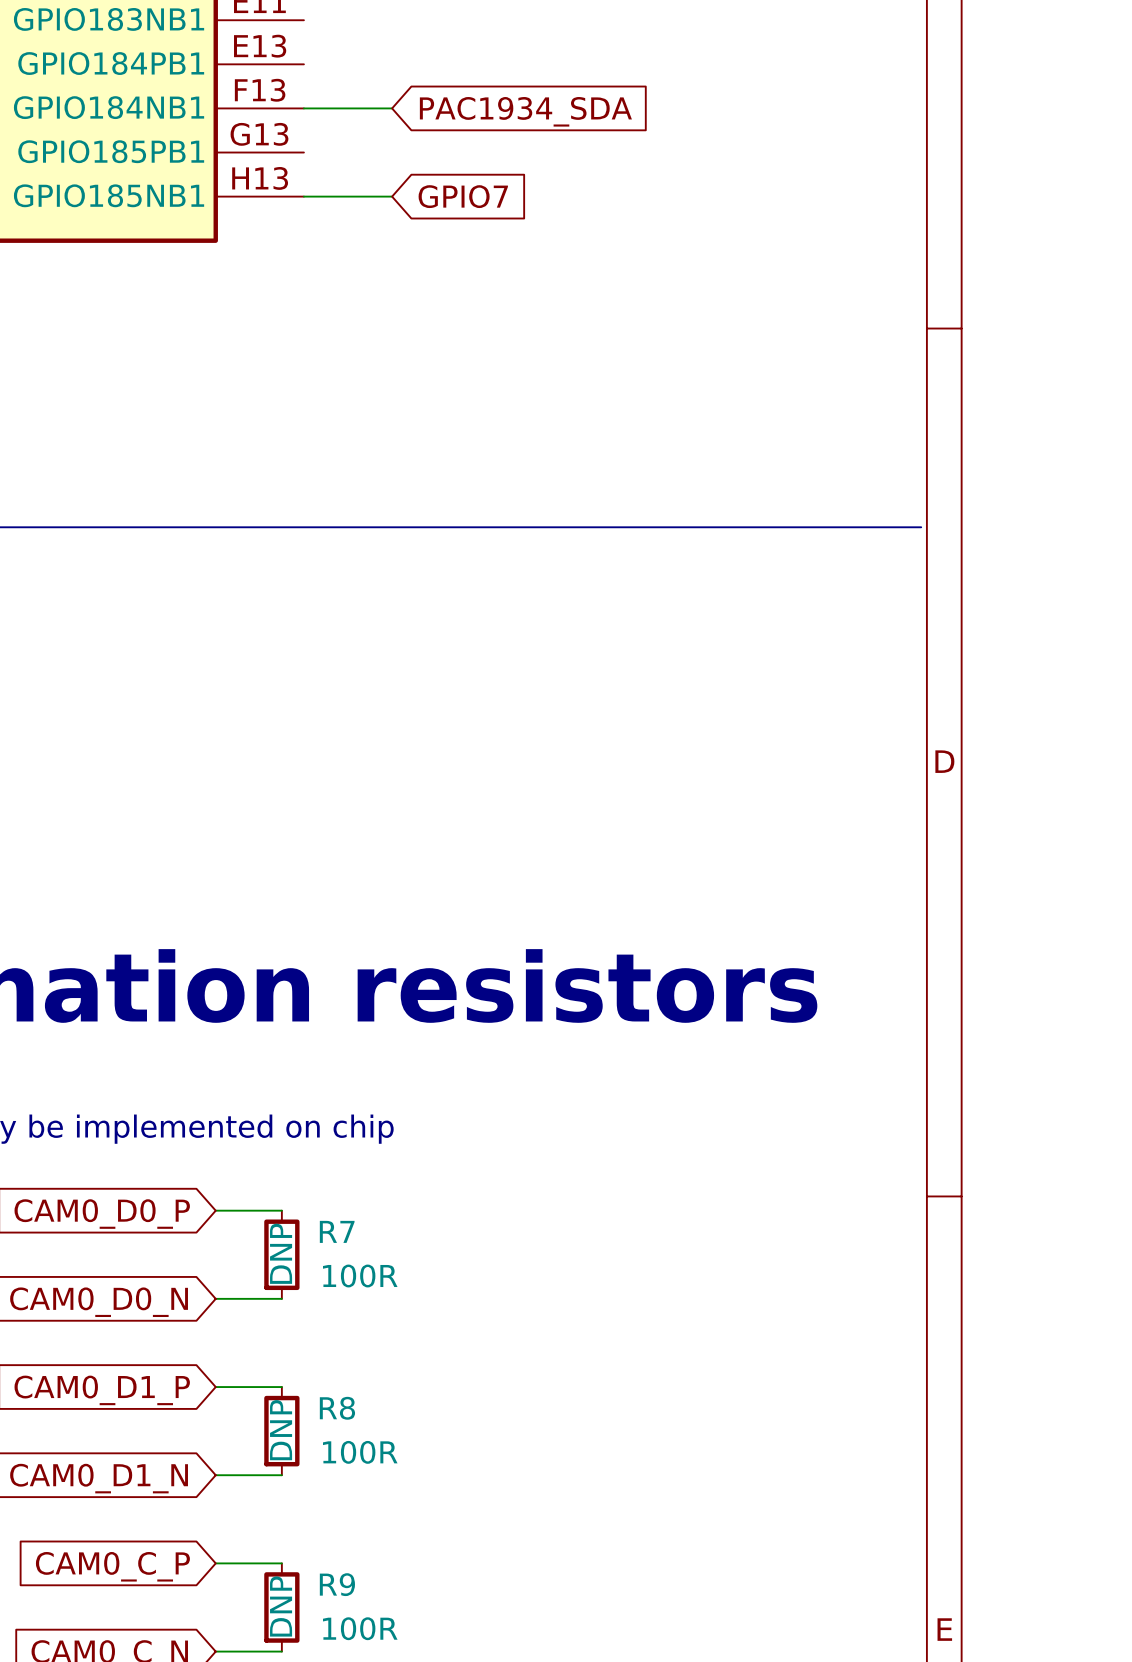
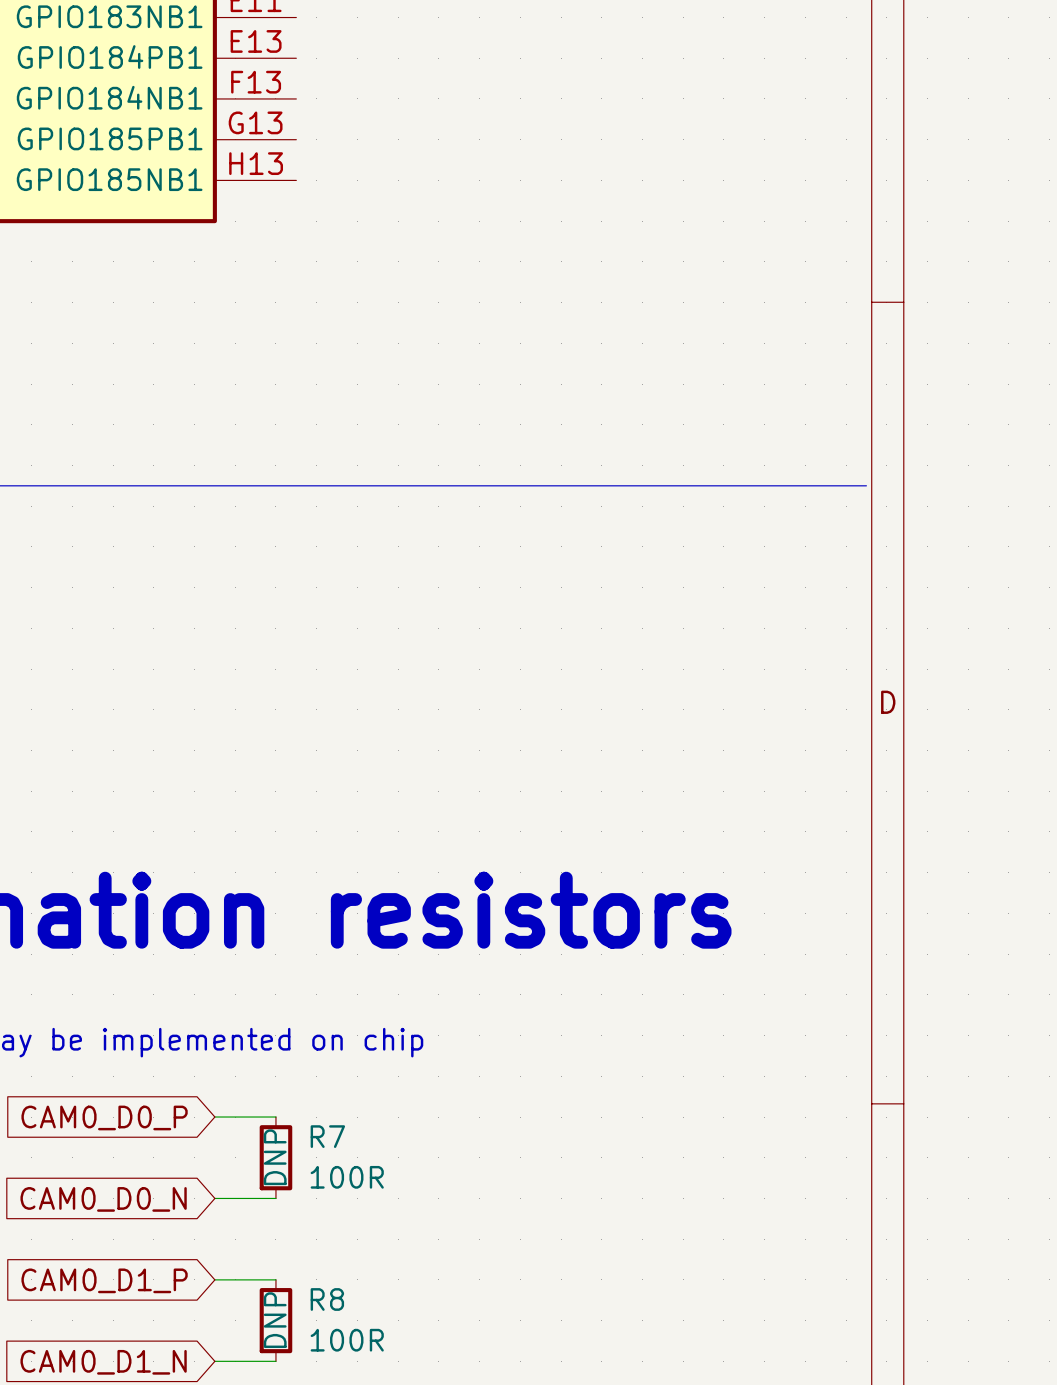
wire: (303, 108) (392, 108) -> none
global label: PAC1934_SDA (525, 111) -> none
wire: (303, 196) (392, 196) -> none
global label: GPIO7 (463, 196) -> none

